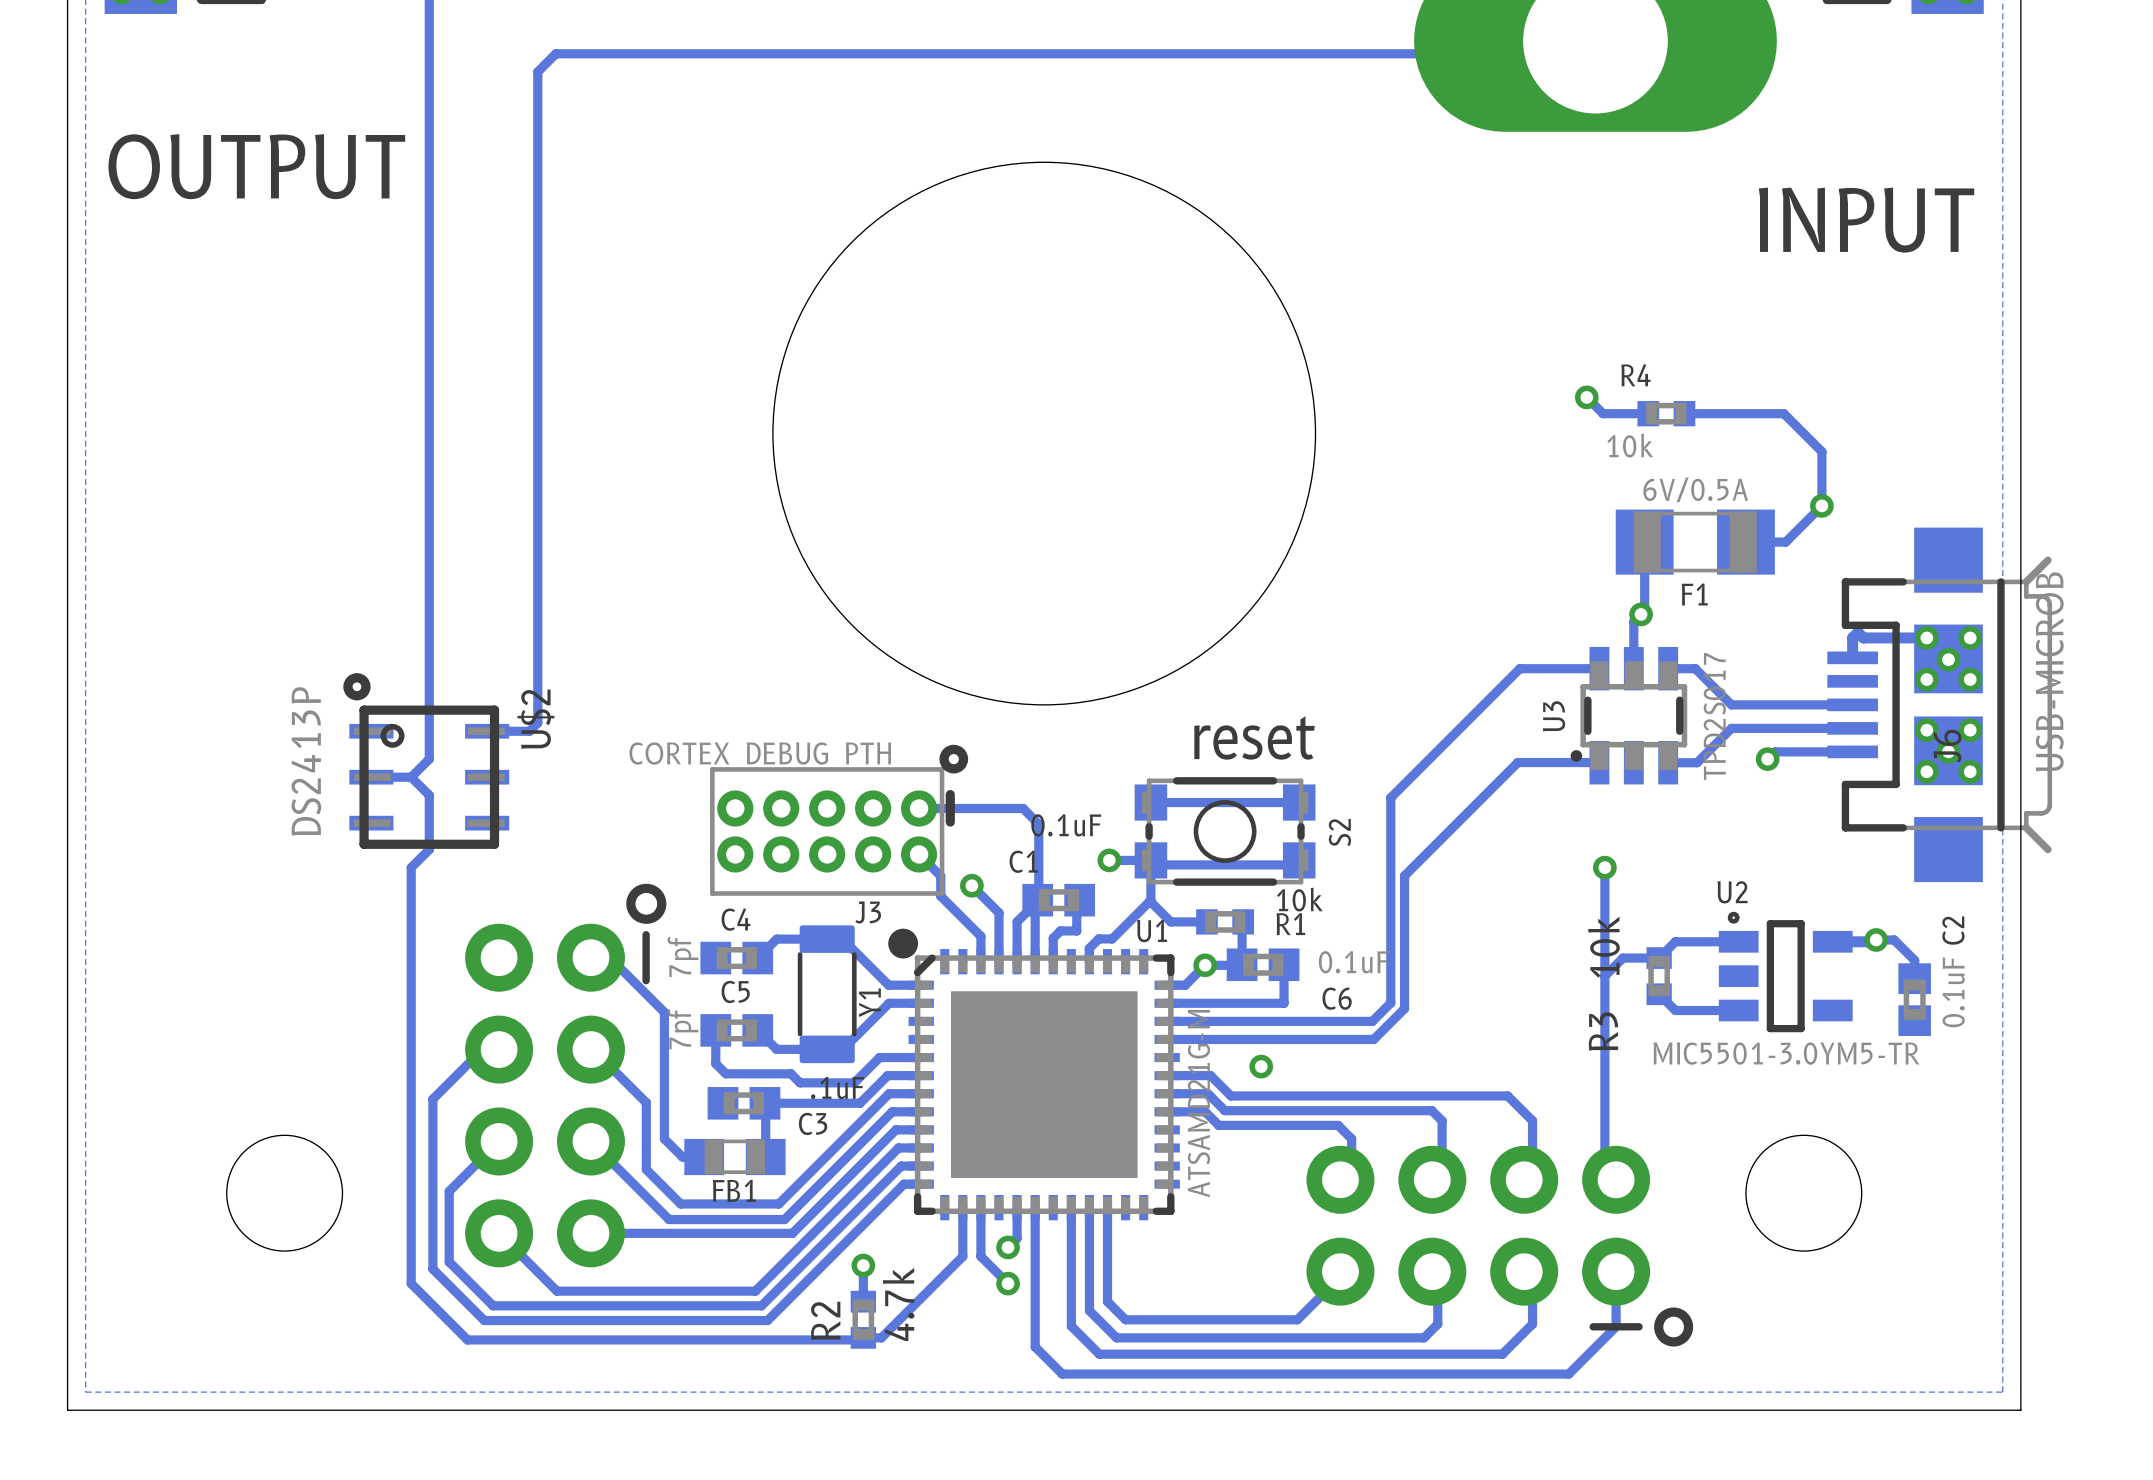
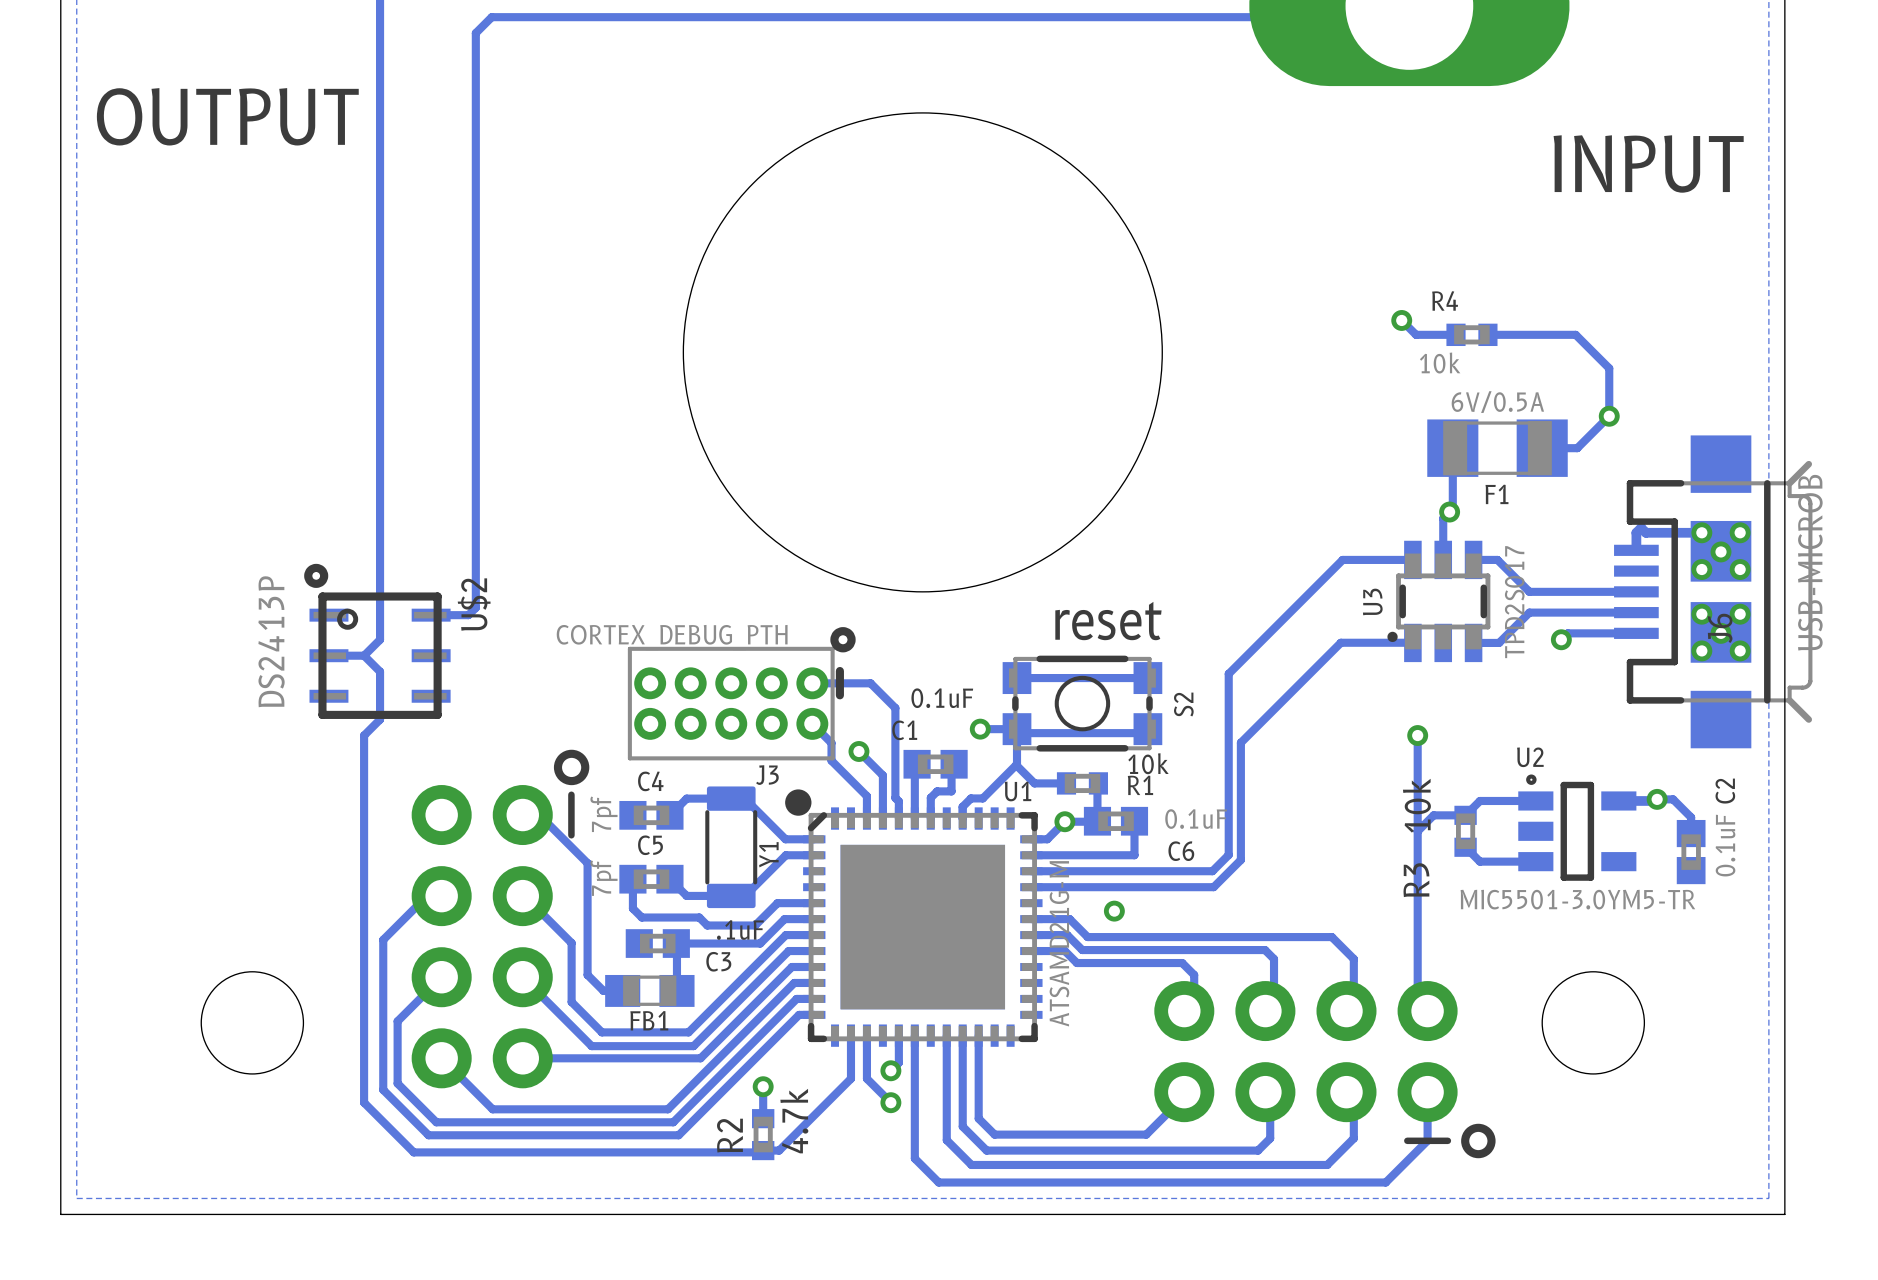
track: (985, 808) (1023, 808) (1038, 824) (1037, 900) -> (870, 683) (895, 708) (895, 797) (898, 801)
track: (1035, 903) (1017, 921) (1017, 942) -> none

